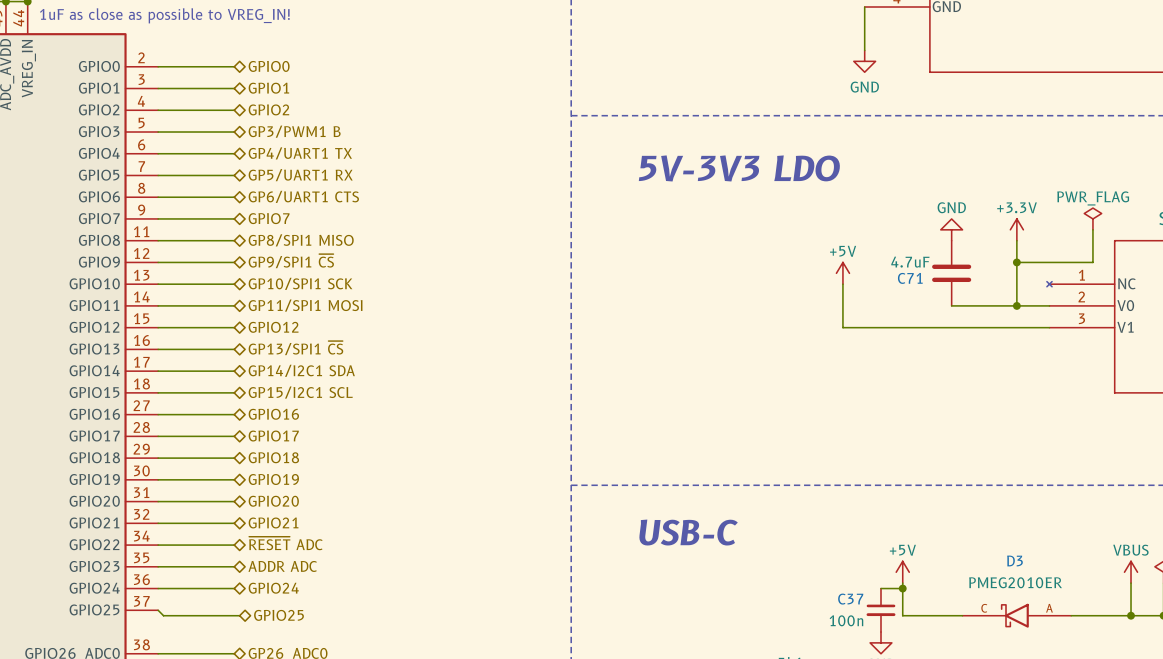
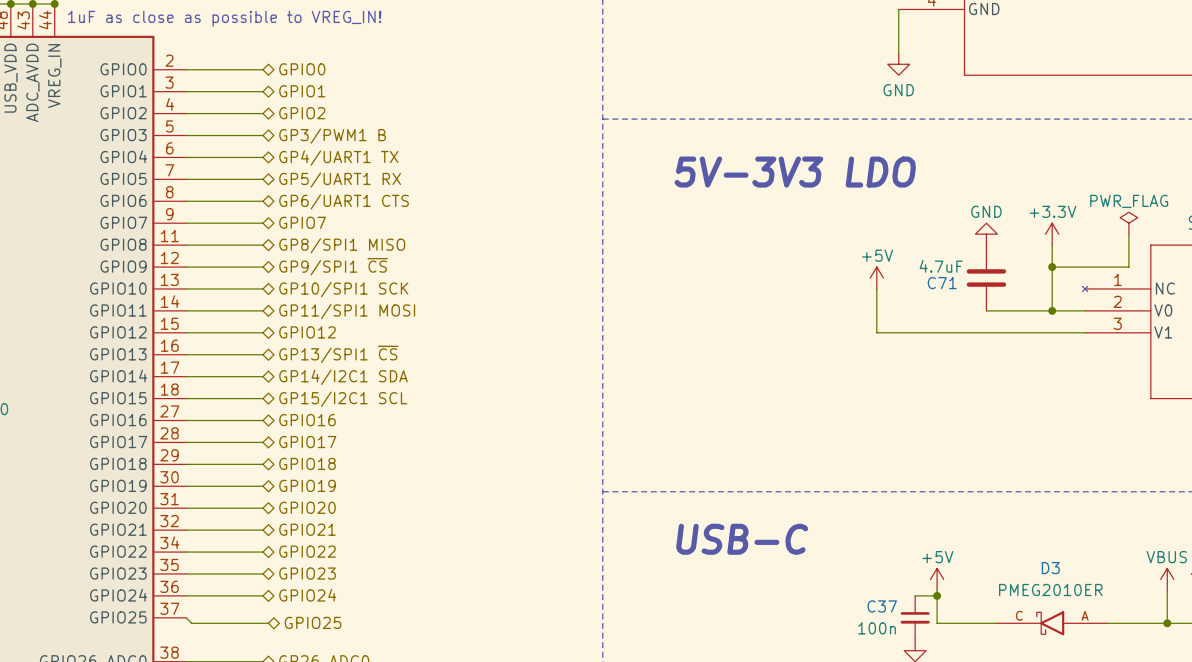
hierarchical label: ~{RESET} ADC (285, 543) -> GPIO22 (307, 551)
hierarchical label: ADDR ADC (282, 566) -> GPIO23 (307, 573)

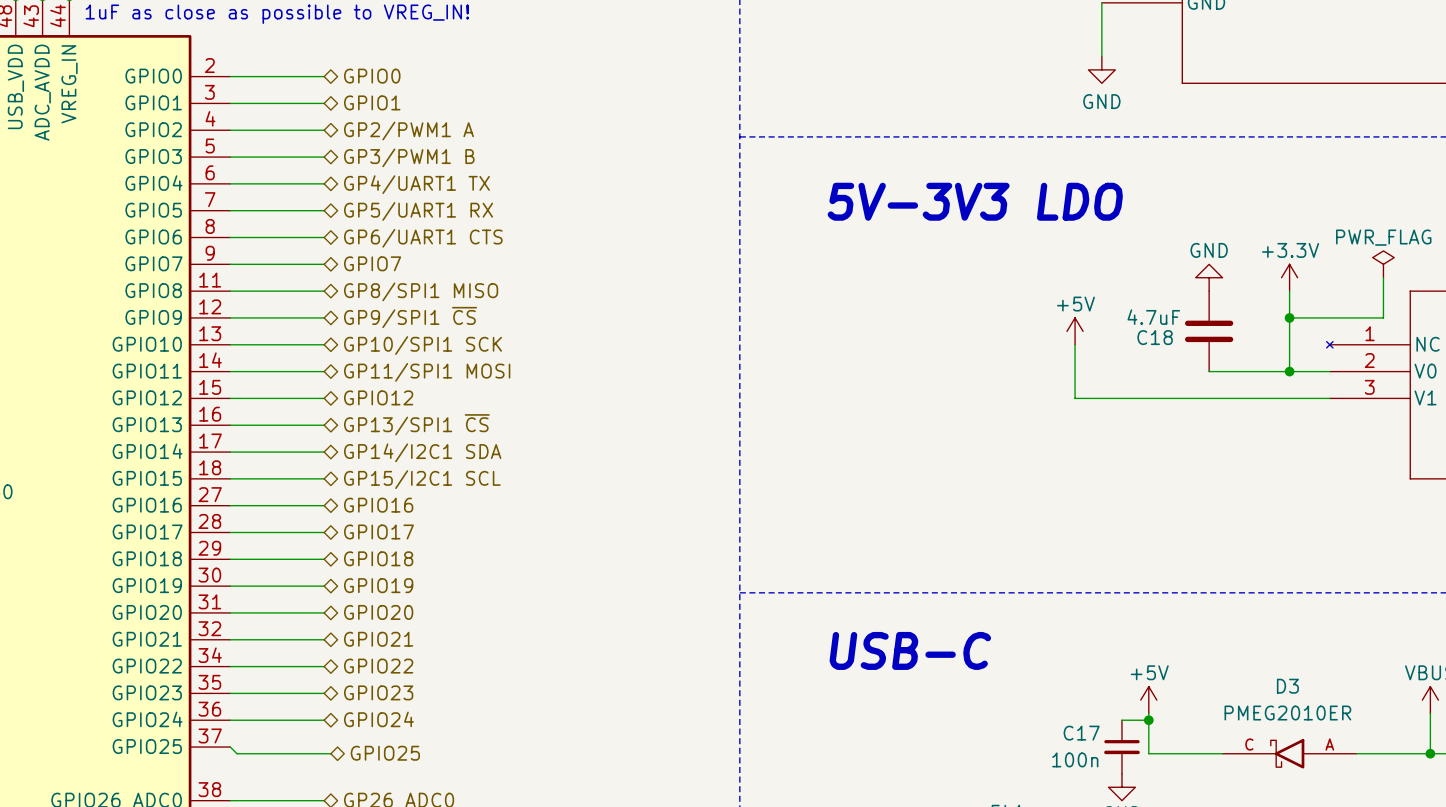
hierarchical label: GPIO2 (302, 113) -> GP2/PWM1 A (408, 131)
C71 name: C71 (942, 283) -> C18 (1155, 337)
C37 name: C37 (882, 606) -> C17 (1081, 733)

